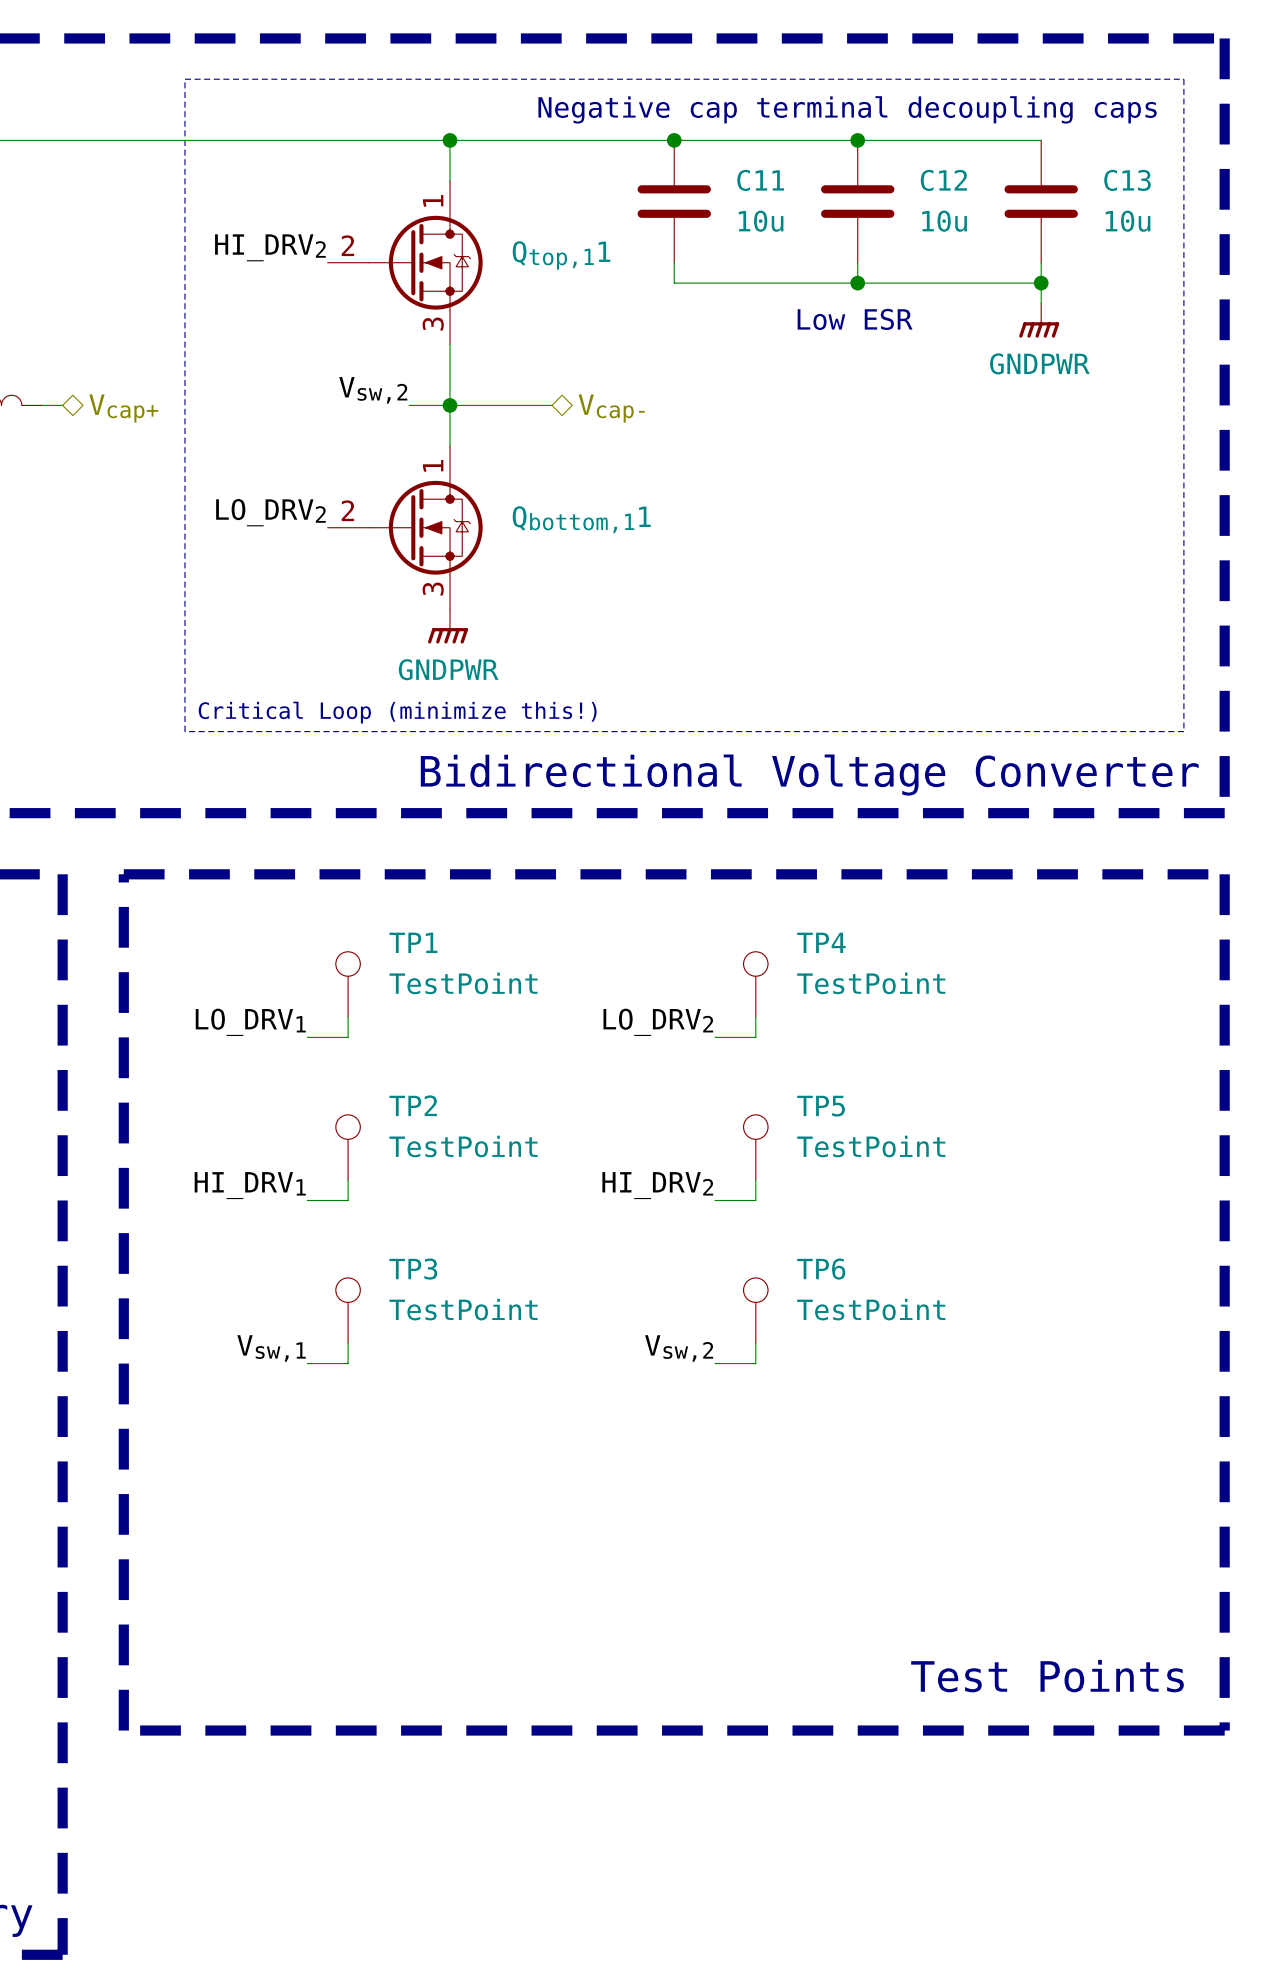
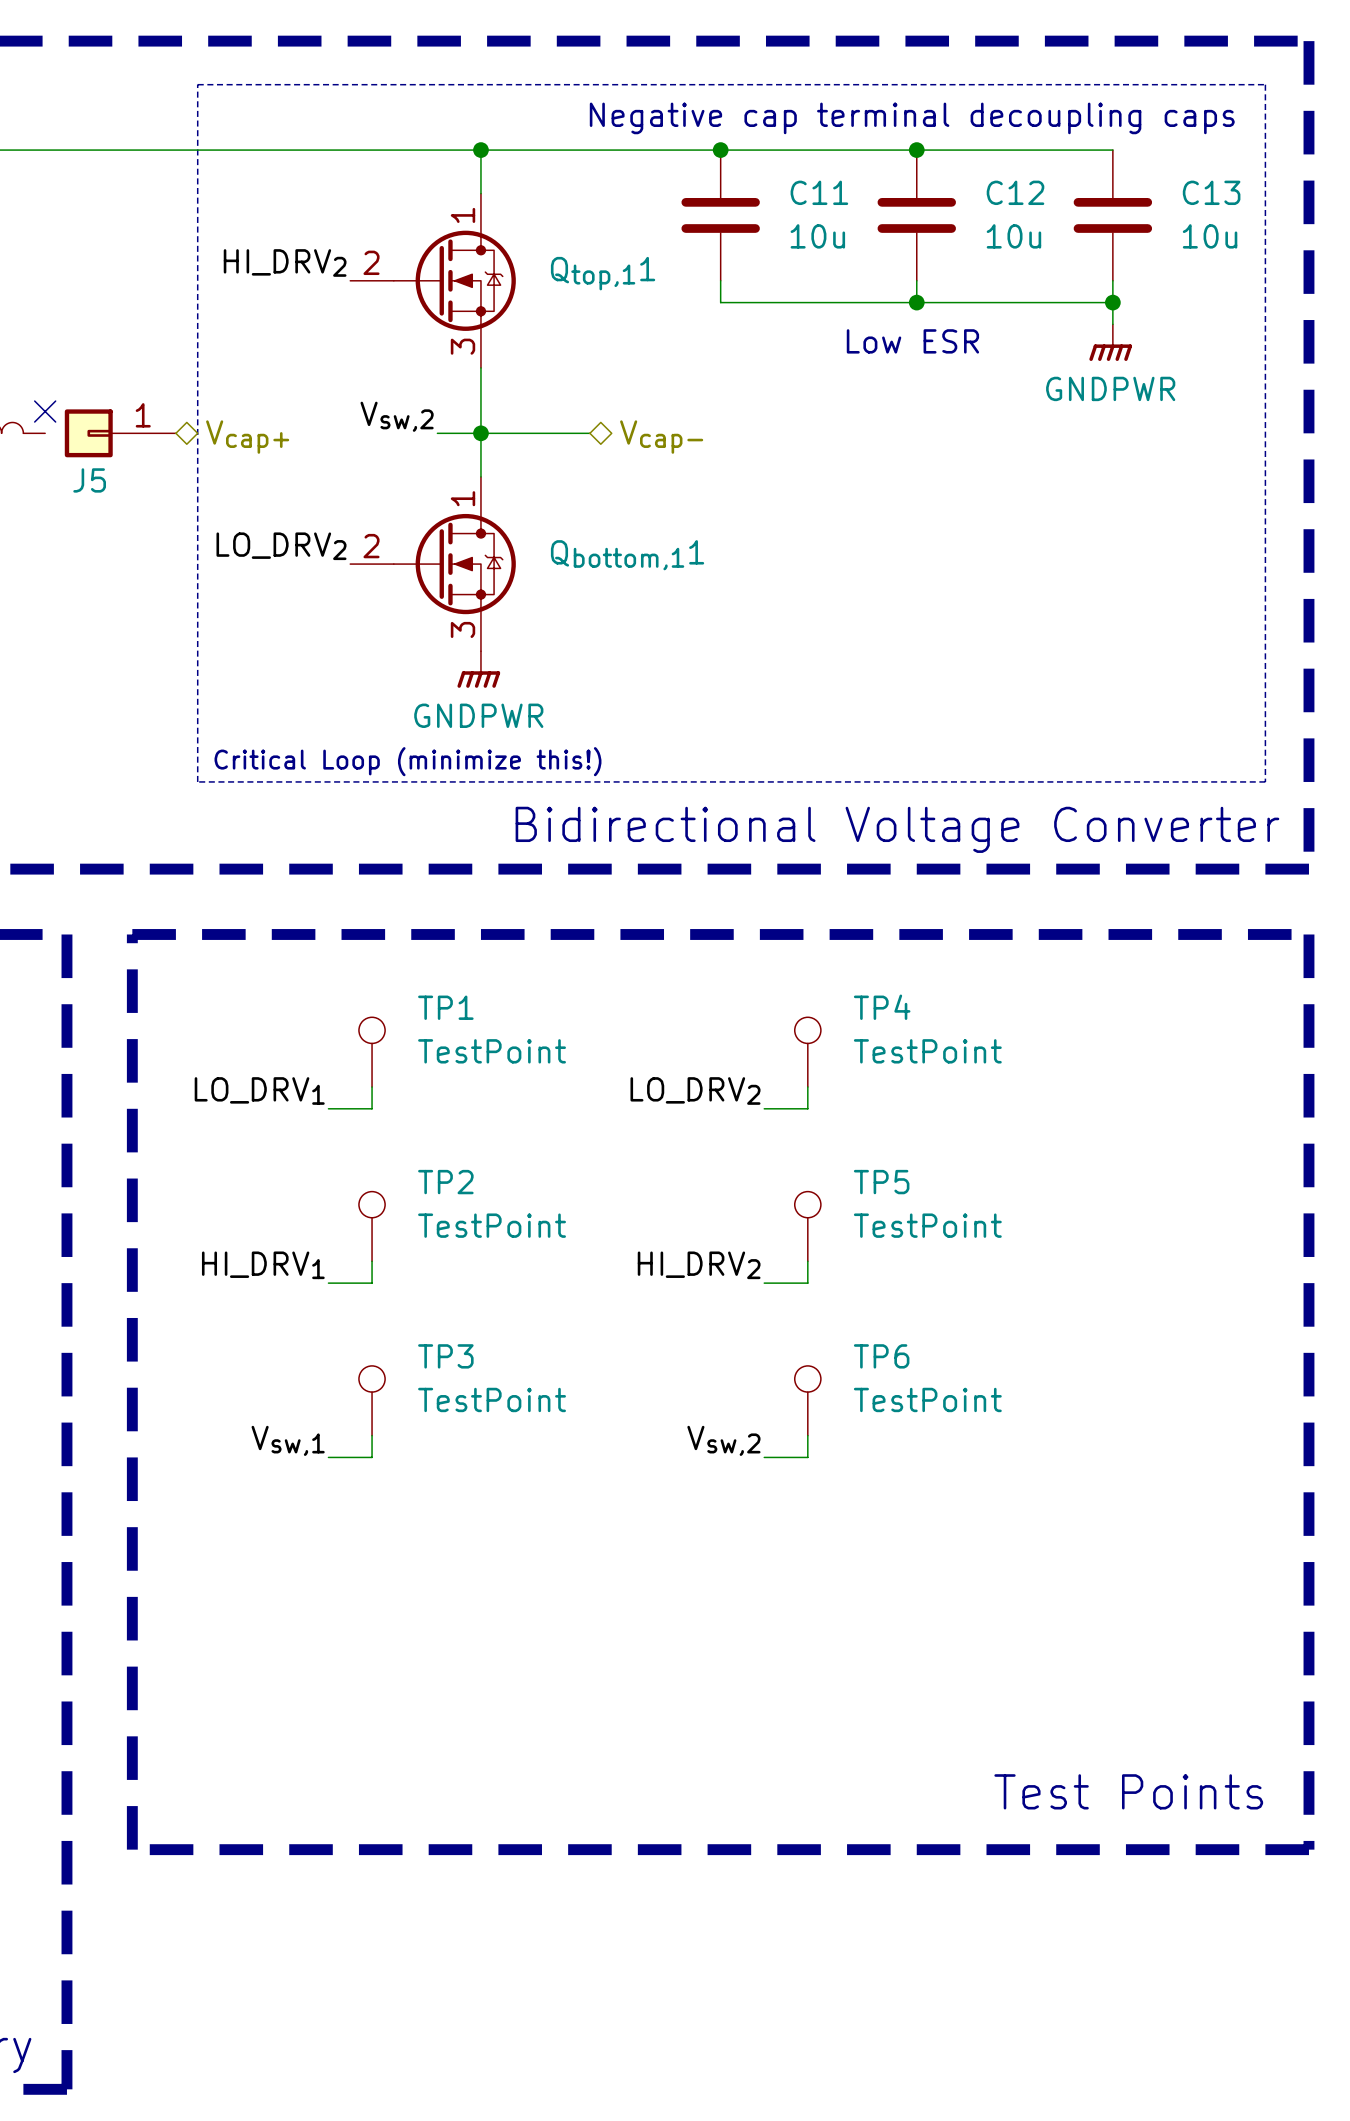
no-connect mark: none -> (45, 411)
wire: (42, 405) (62, 405) -> none
J5: none -> (120, 433)
hierarchical label position: Vcap+ (123, 408) -> Vcap+ (247, 437)

